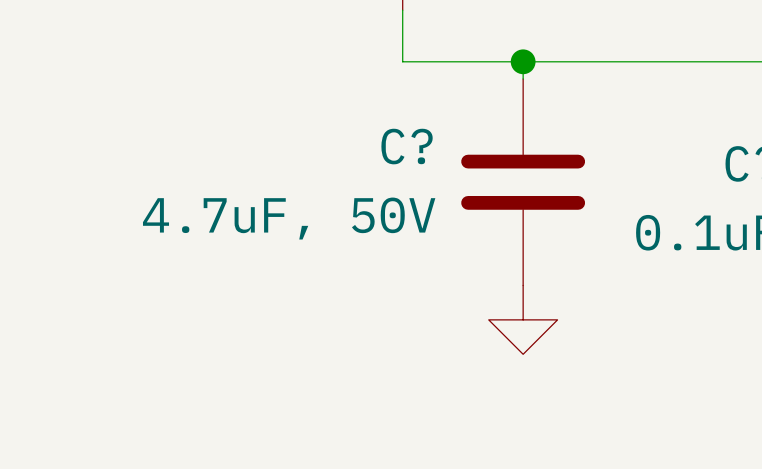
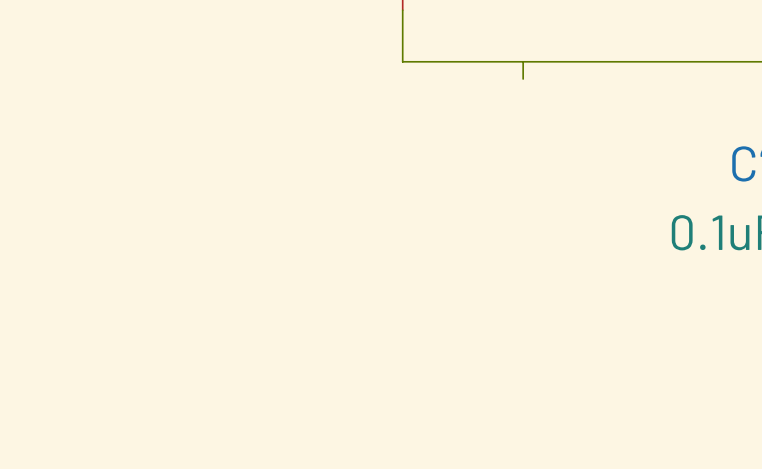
junction: (523, 61) -> none
C?: 4.7uF, 50V (523, 182) -> none
power symbol: (523, 319) -> none

